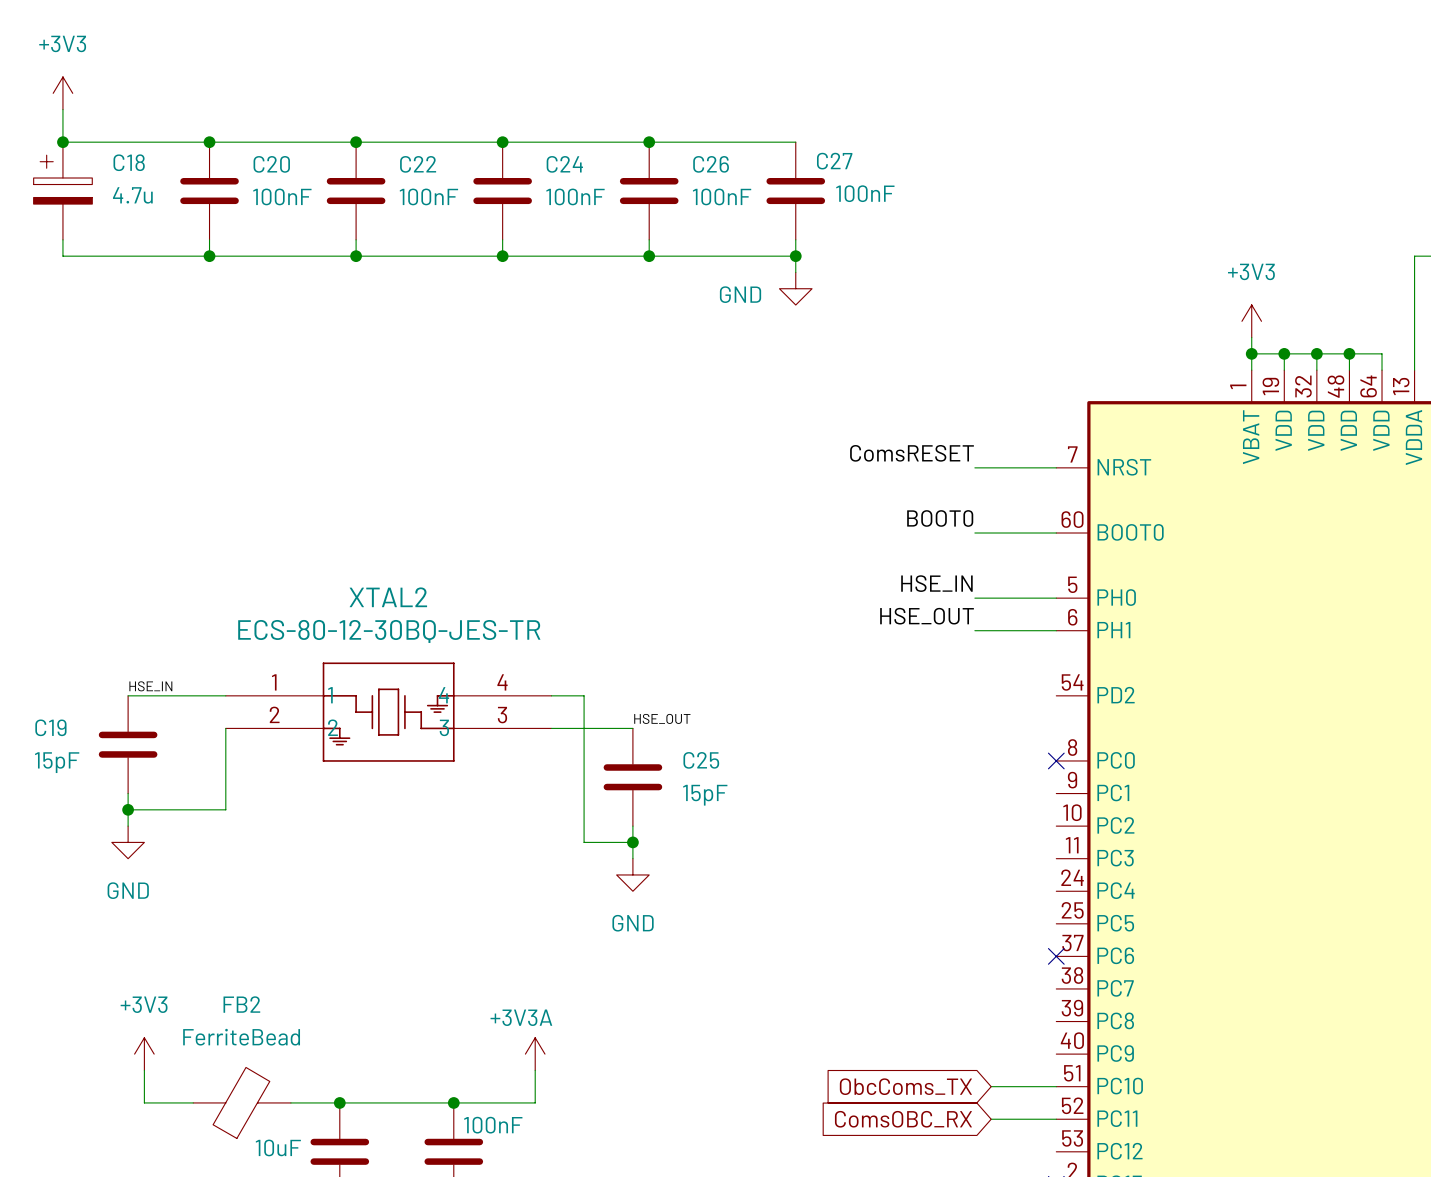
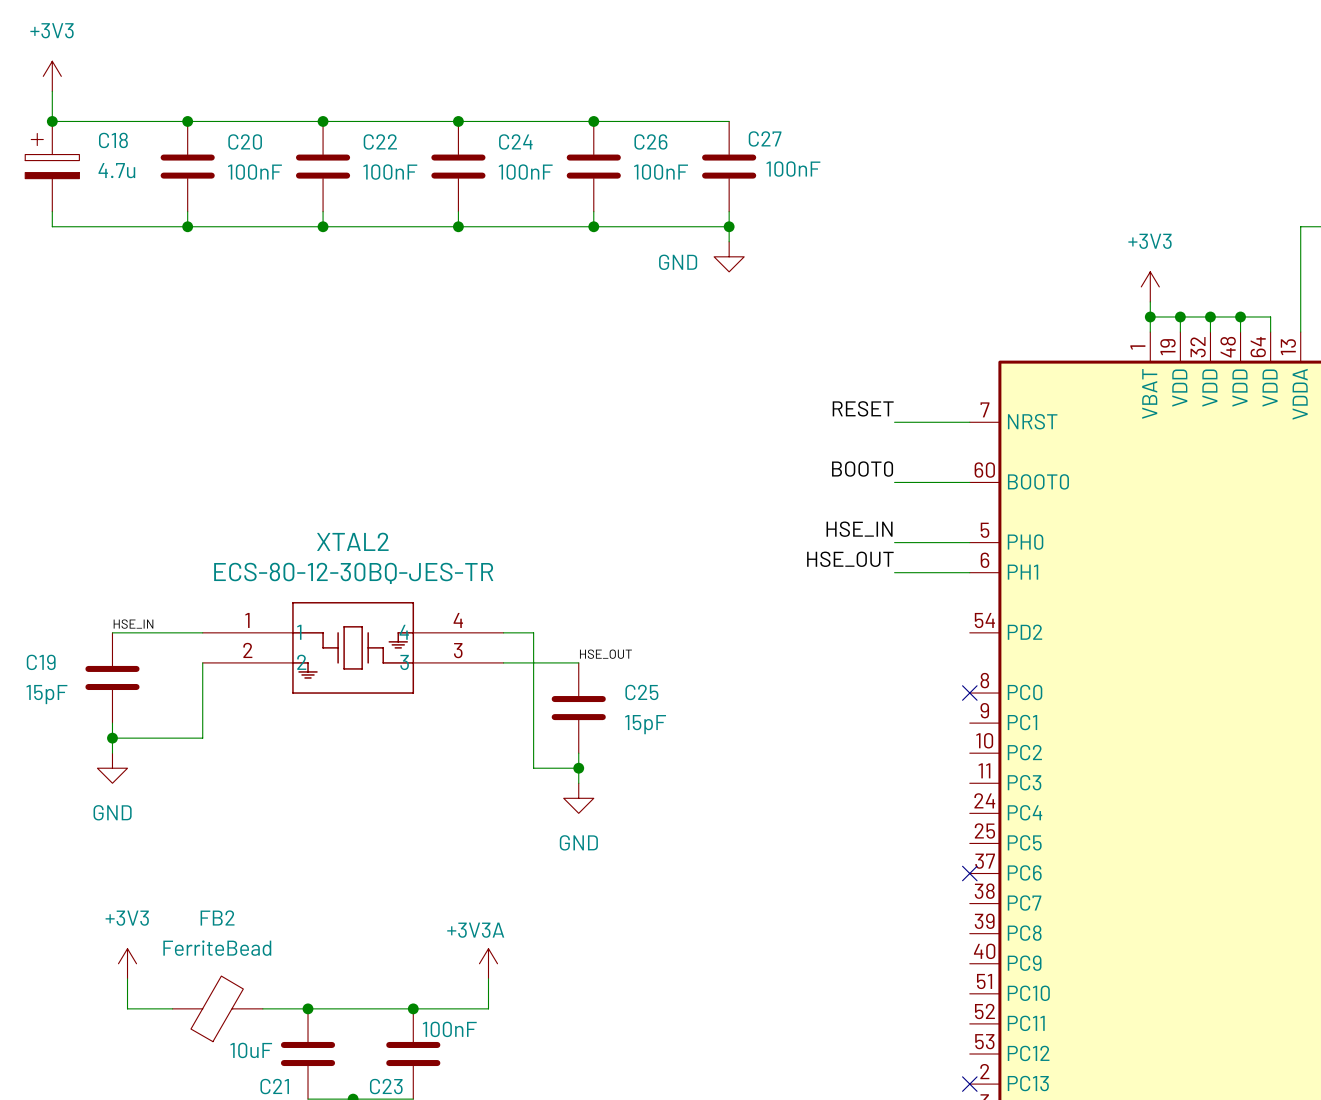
label: ComsRESET (912, 453) -> RESET (863, 408)
global label: ObcComs_TX (905, 1086) -> none
wire: (991, 1086) (1056, 1086) -> none
global label: ComsOBC_RX (903, 1119) -> none
wire: (991, 1119) (1056, 1119) -> none

